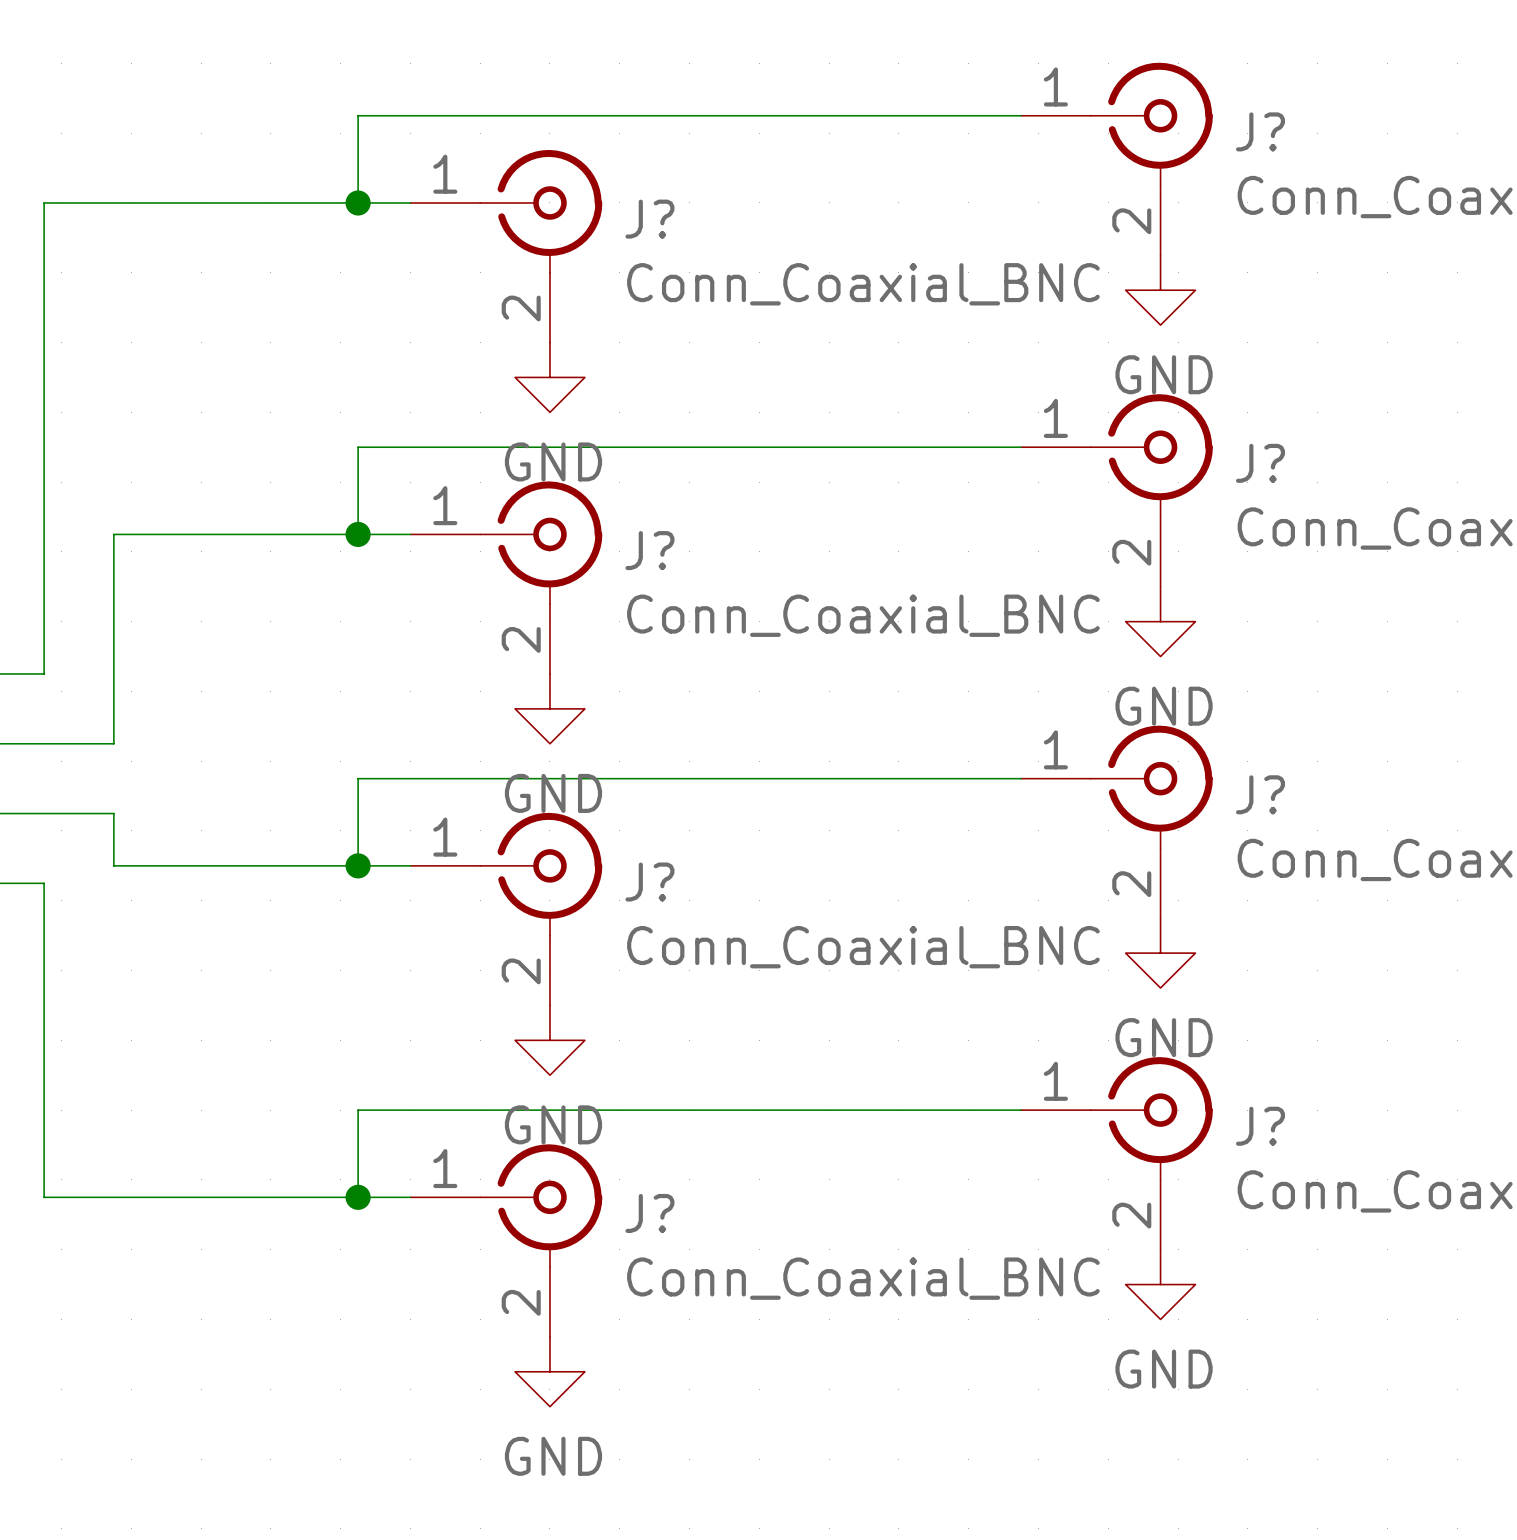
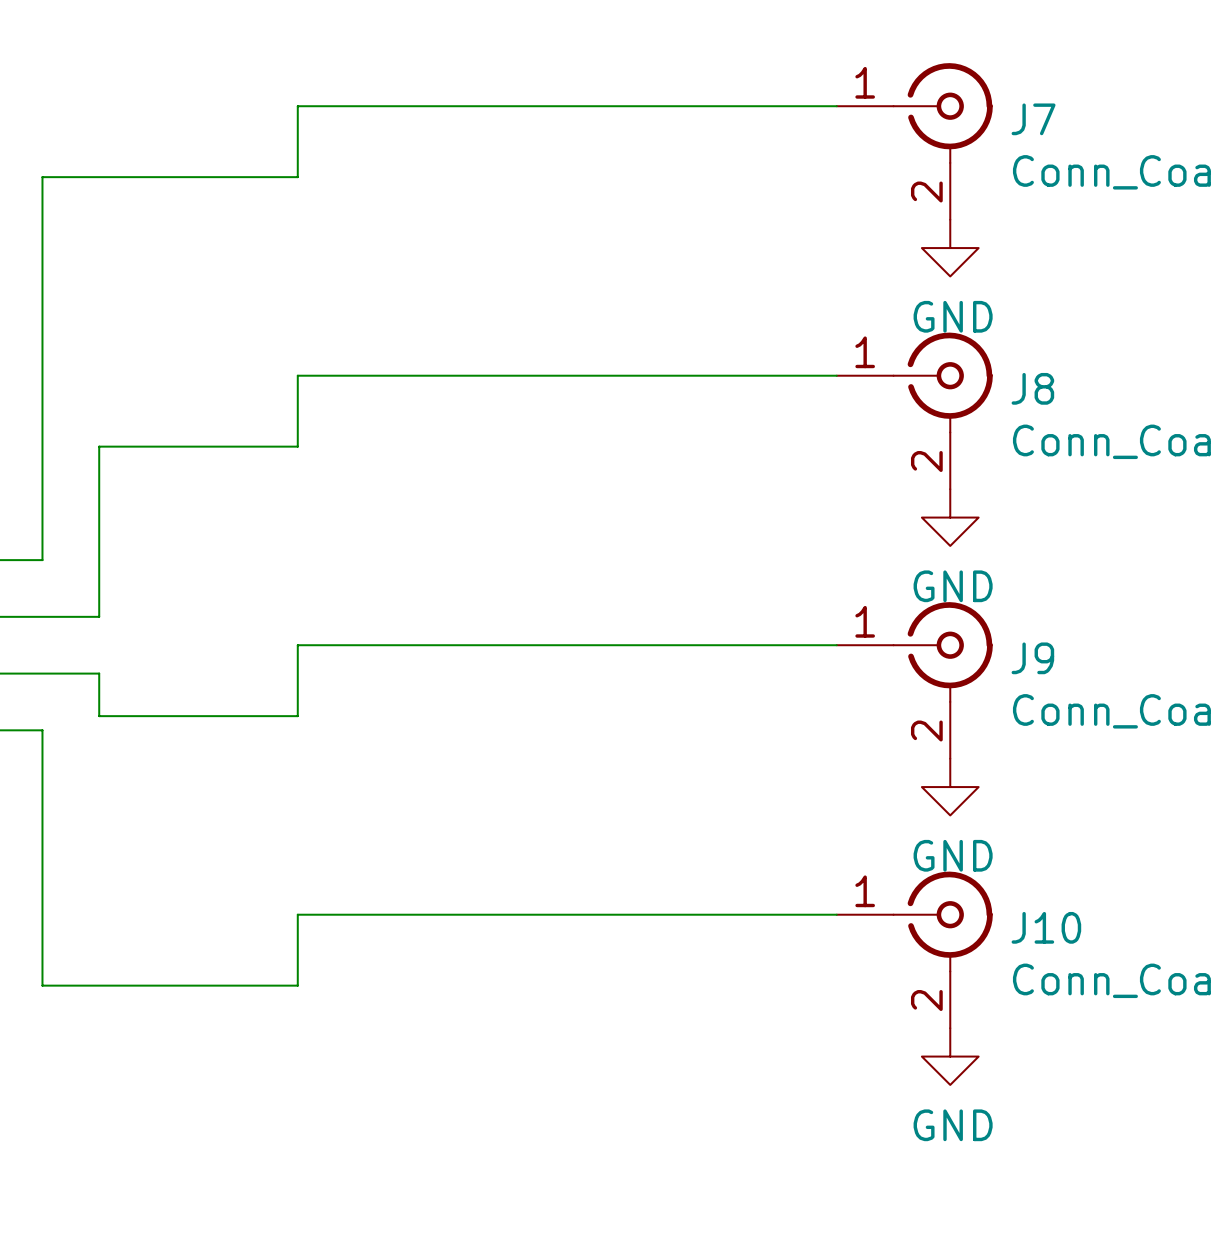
J? name: J? (1260, 131) -> J7 (1033, 119)
wire: (358, 202) (410, 202) -> none
junction: (358, 202) -> none
J?: Conn_Coaxial_BNC (506, 246) -> none
power symbol: GND (549, 377) -> none
J? name: J? (1260, 463) -> J8 (1032, 388)
wire: (358, 534) (410, 534) -> none
junction: (358, 534) -> none
J?: Conn_Coaxial_BNC (506, 577) -> none
power symbol: GND (549, 708) -> none
J? name: J? (1260, 794) -> J9 (1032, 658)
wire: (358, 865) (410, 865) -> none
junction: (358, 865) -> none
J?: Conn_Coaxial_BNC (506, 909) -> none
power symbol: GND (549, 1040) -> none
J? name: J? (1260, 1126) -> J10 (1046, 927)
wire: (358, 1197) (410, 1197) -> none
junction: (358, 1197) -> none
J?: Conn_Coaxial_BNC (506, 1240) -> none
power symbol: GND (549, 1371) -> none

